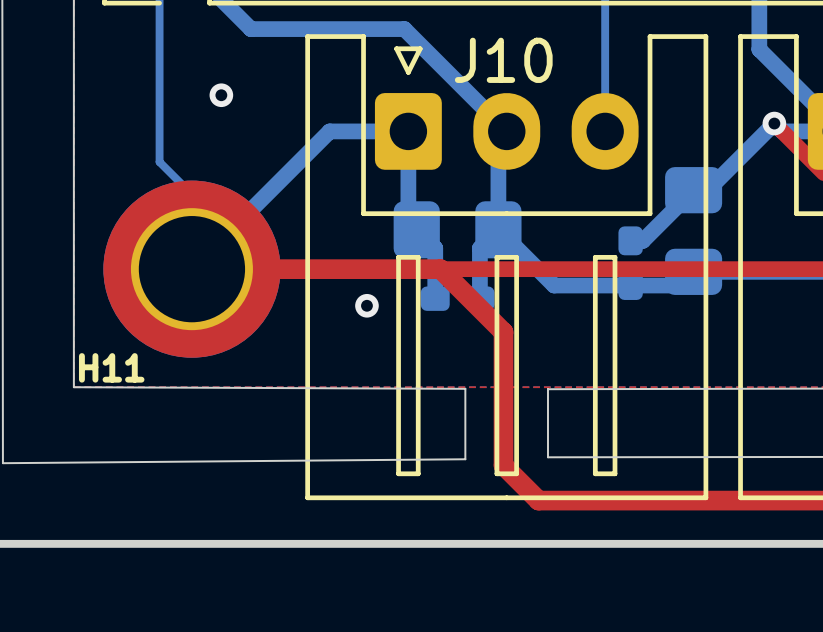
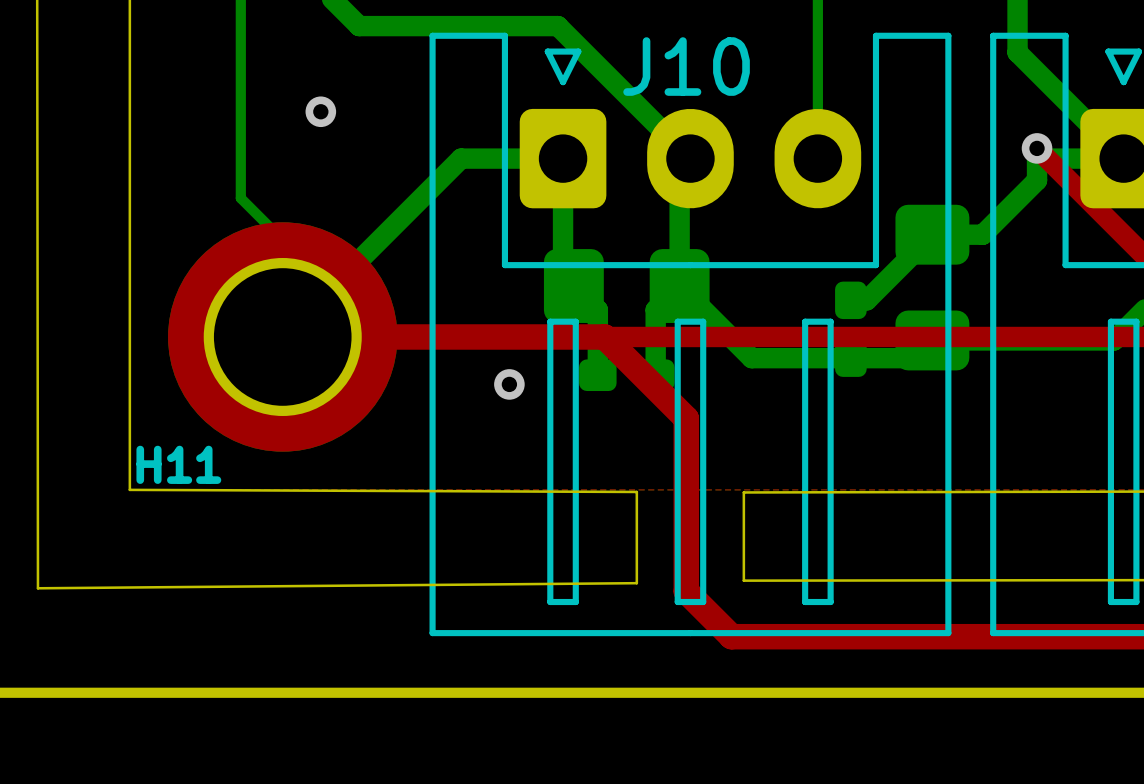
bottom track: (774, 123) (707, 190) -> (1037, 148) (1037, 180) (982, 234) (950, 234)

